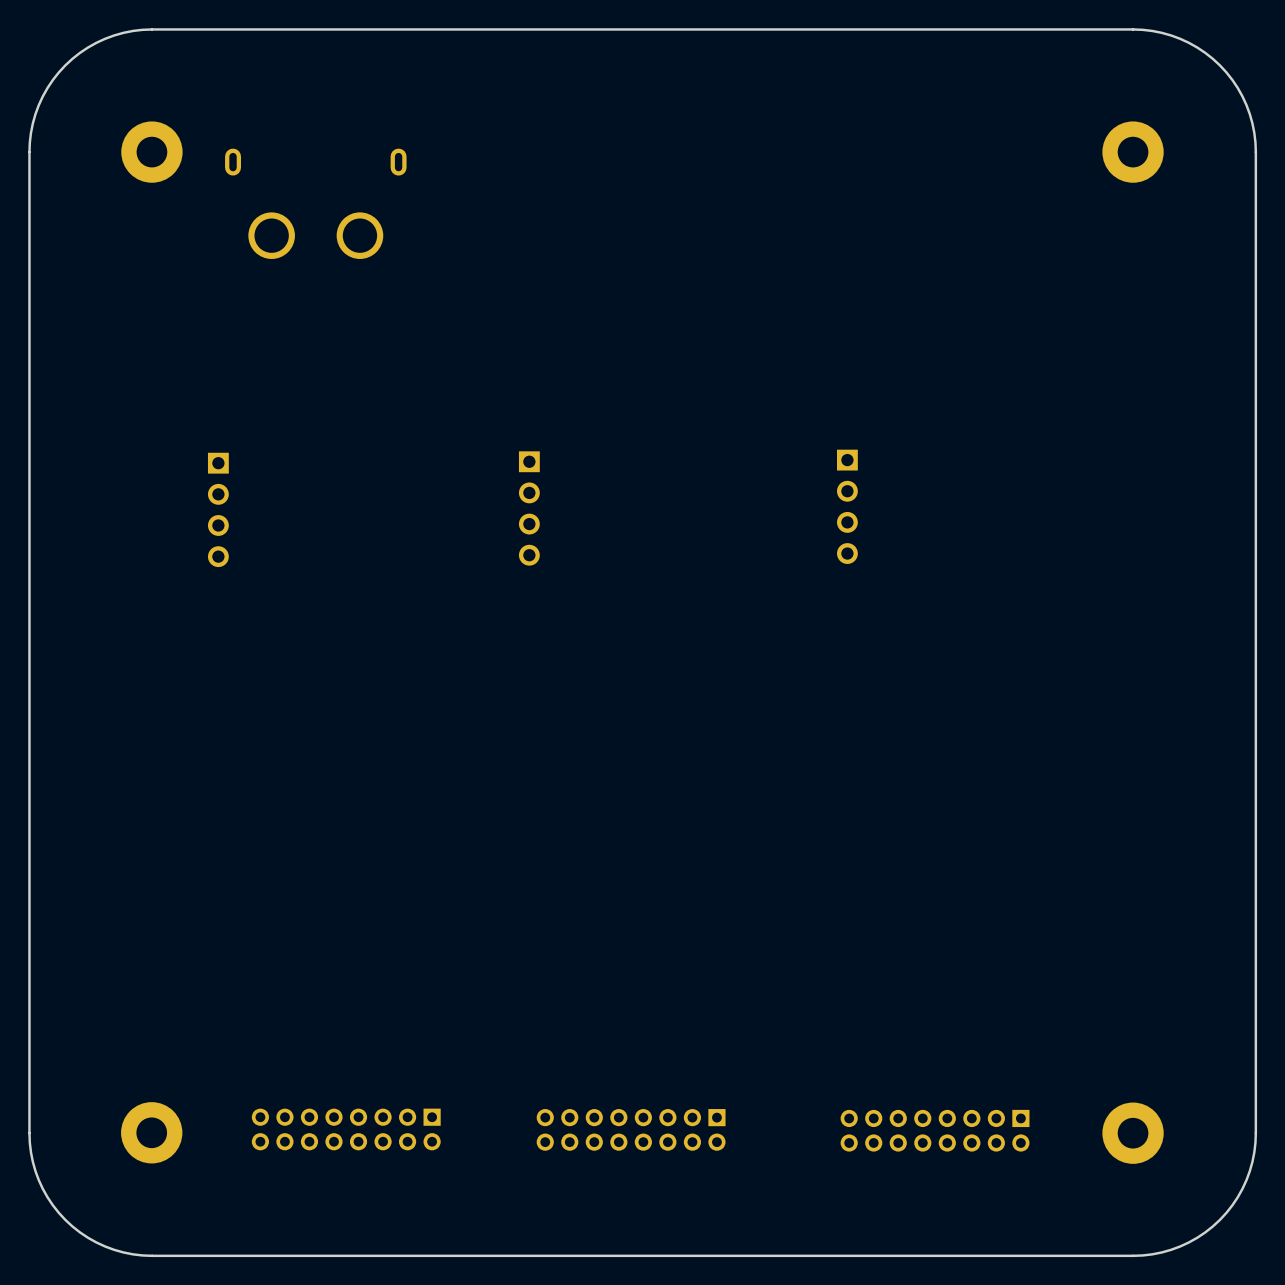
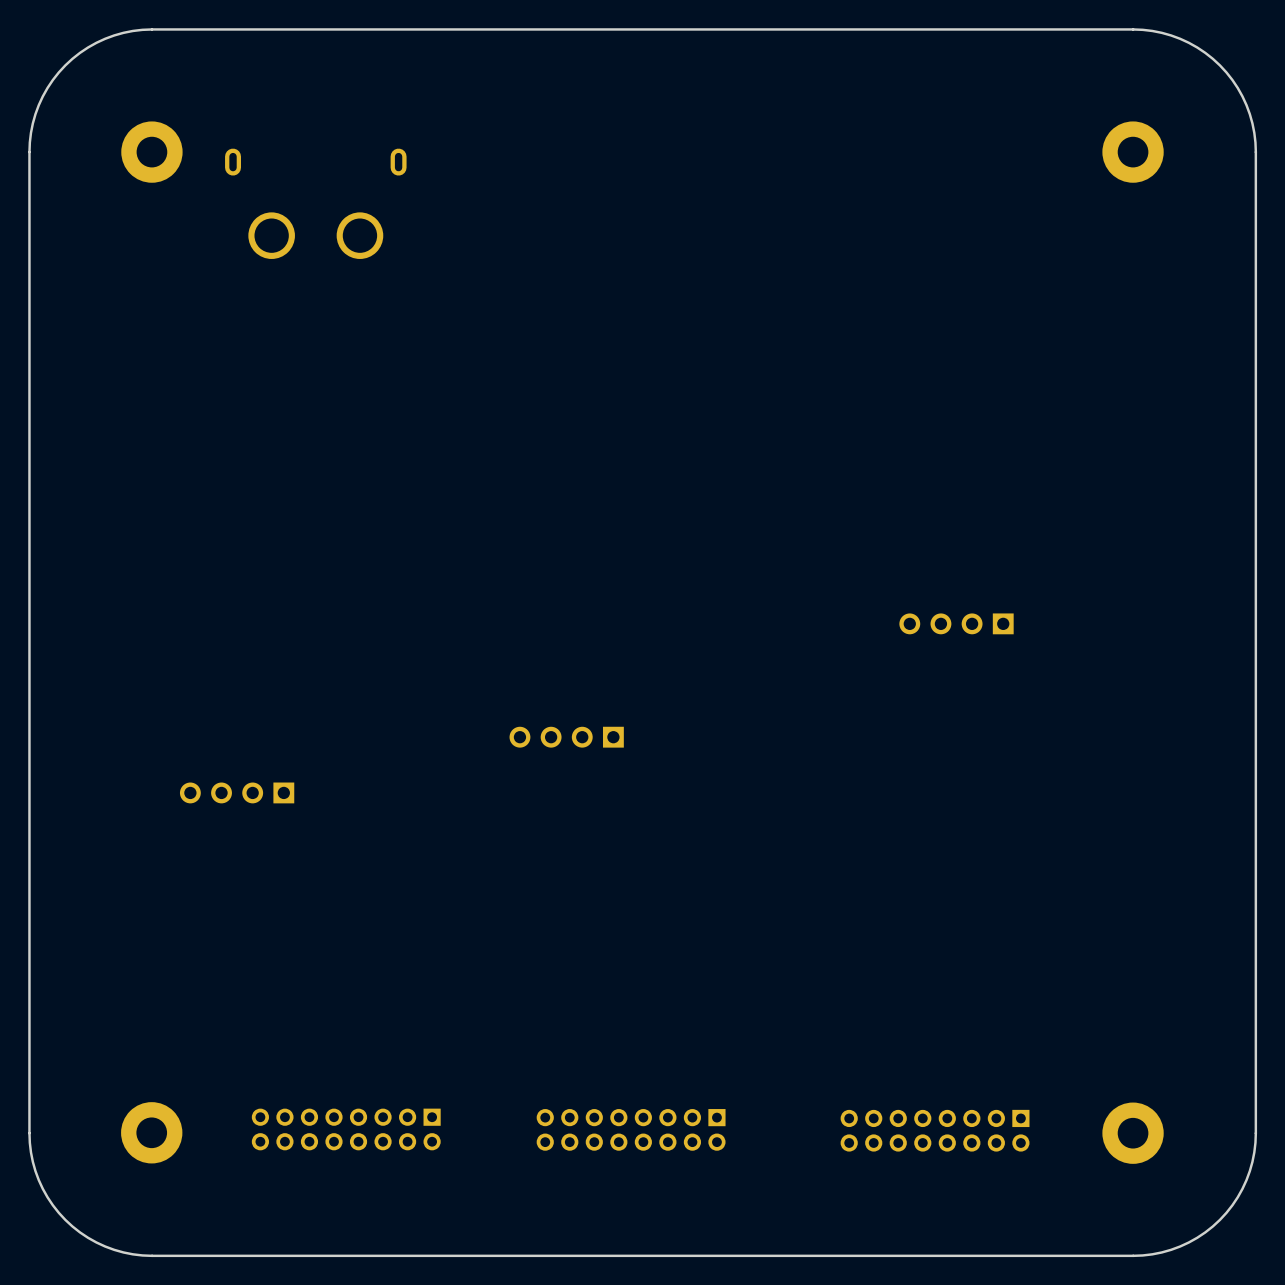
part rotation: 0° (847, 506) -> 90° clockwise (956, 623)
part position: (847, 506) -> (956, 623)
part: (529, 508) -> none
part: (218, 509) -> none
part: none -> (566, 737)
part: none -> (237, 792)

